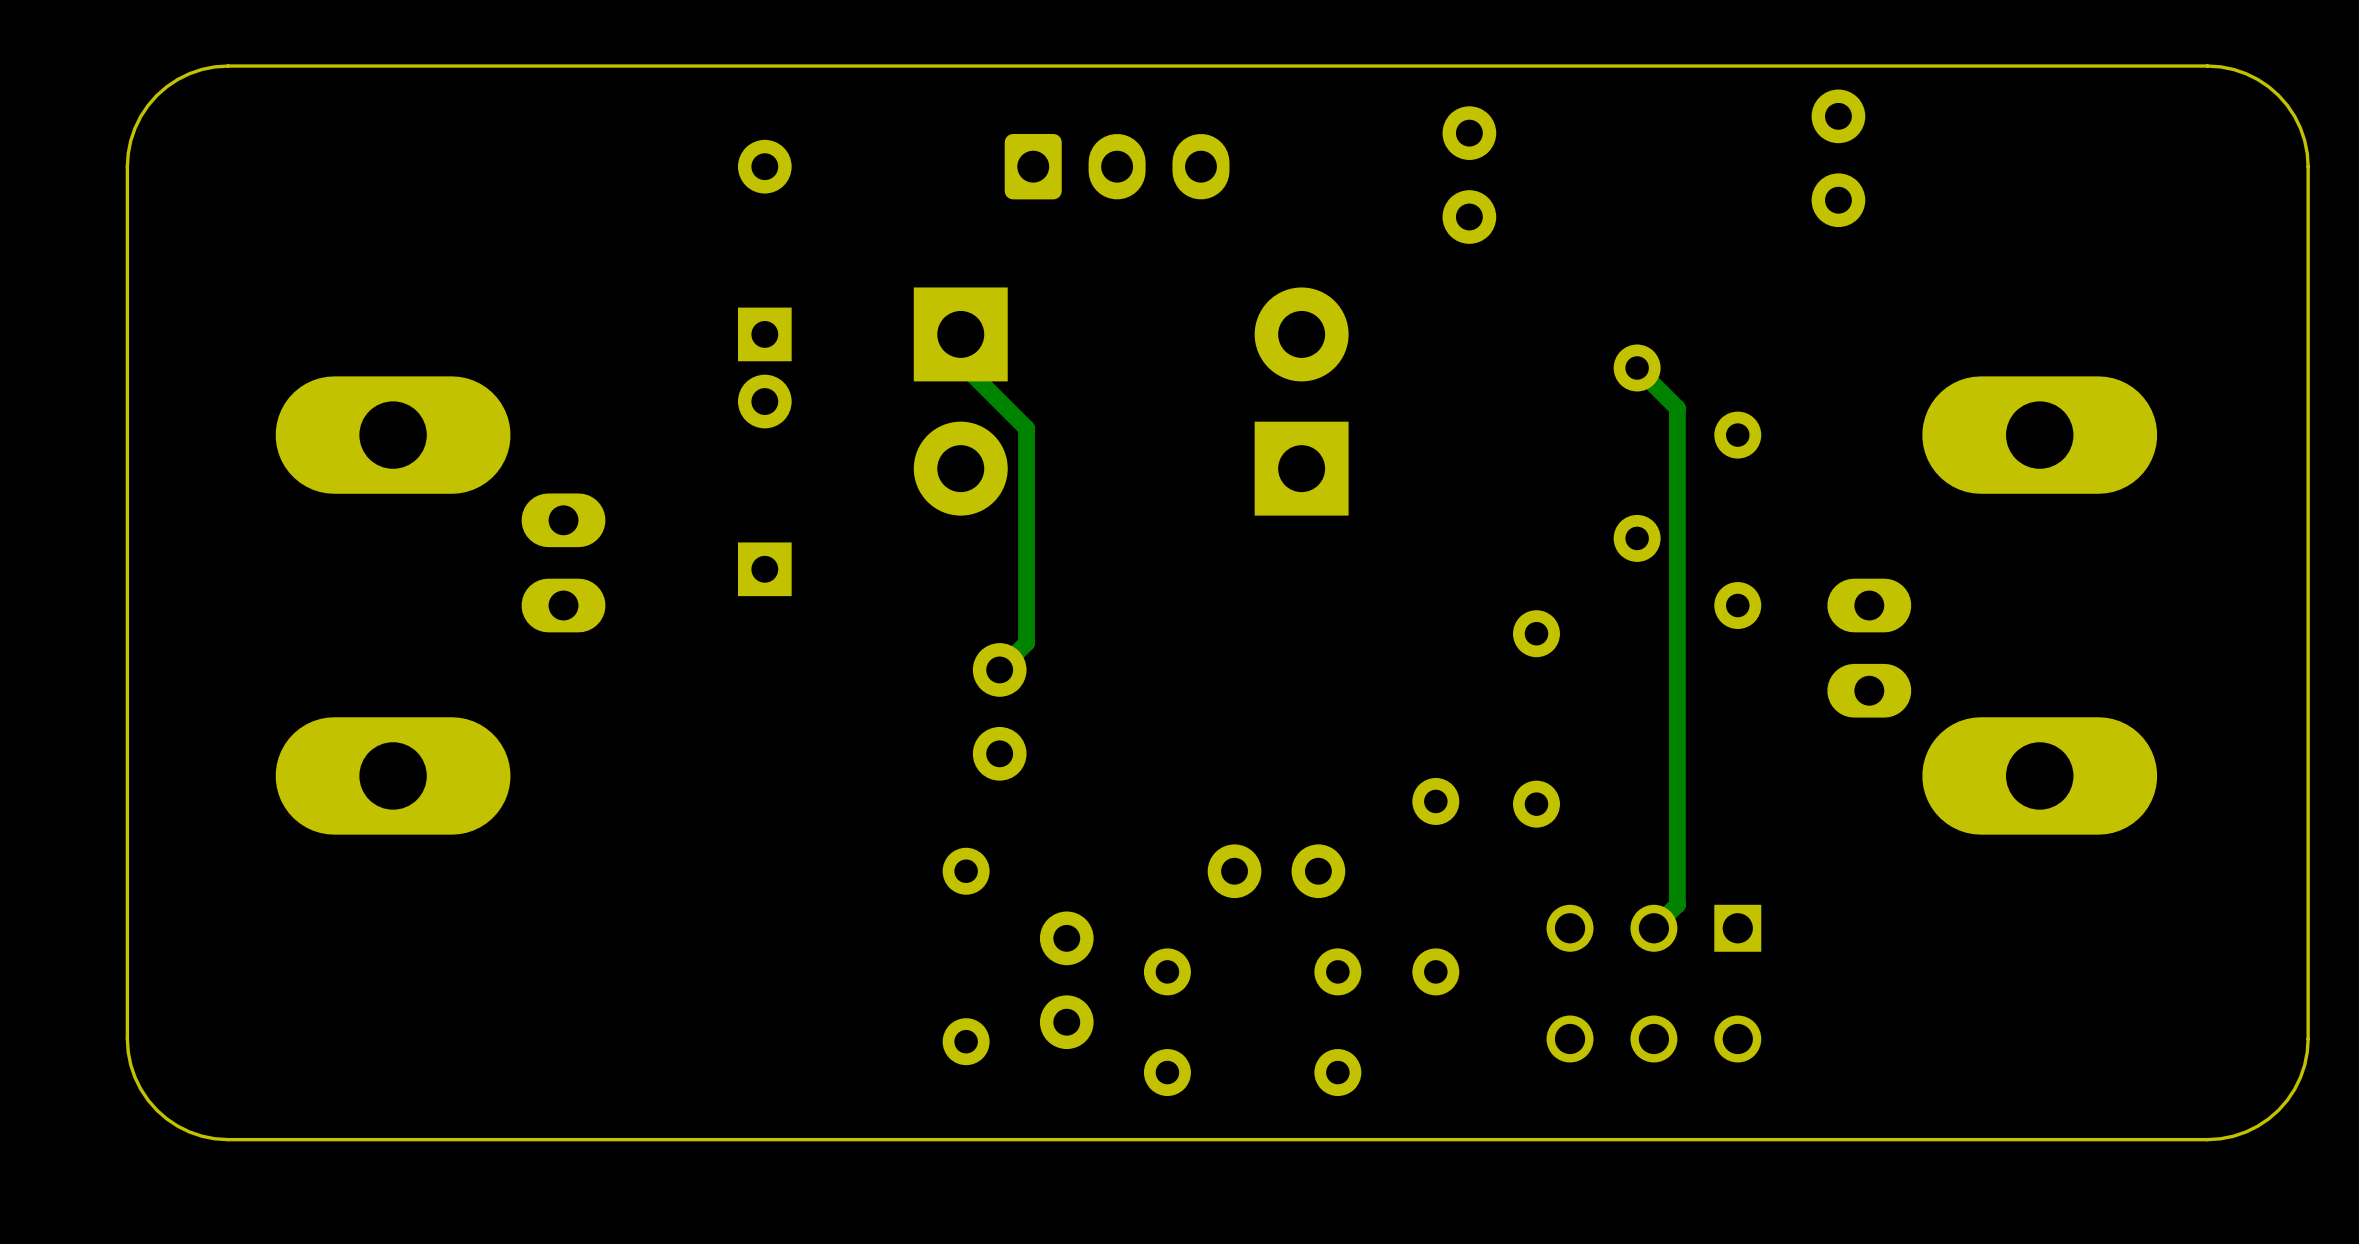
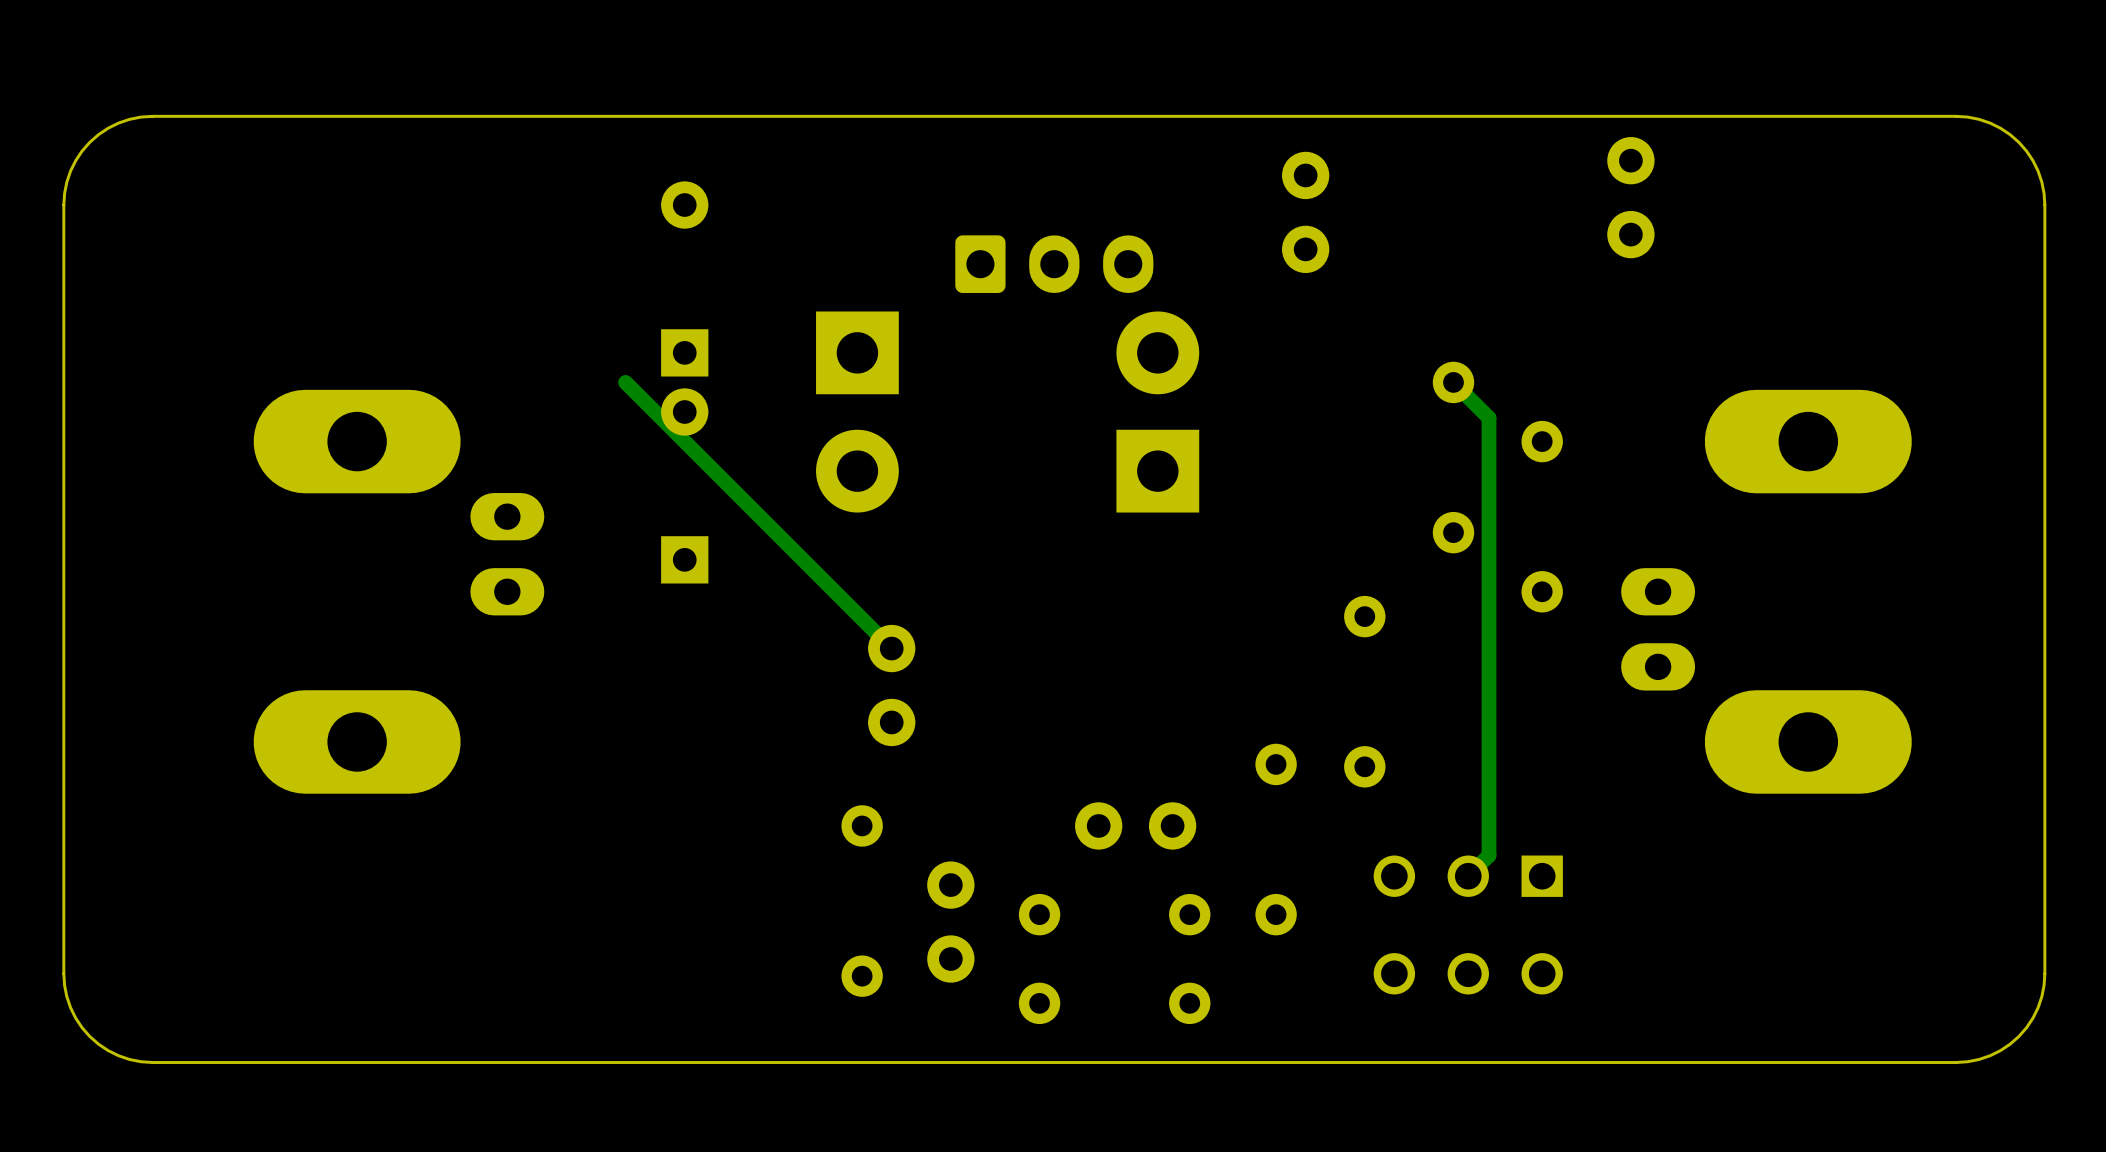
board edge: (228, 66) (201, 69) (189, 73) (177, 79) (156, 95) (140, 116) (135, 128) (128, 153) (127, 166) (128, 1052) (135, 1077) (140, 1089) (156, 1110) (177, 1126) (189, 1131) (201, 1136) (228, 1139) -> (211, 116) (140, 117) (129, 119) (108, 128) (89, 142) (75, 160) (66, 182) (63, 205) (64, 985) (70, 1007) (75, 1018) (89, 1036) (108, 1050) (129, 1059) (140, 1061) (211, 1062)
part position: (1117, 166) -> (1054, 264)
track: (960, 334) (960, 362) (1026, 428) (1026, 643) (999, 669) -> (625, 382) (891, 648)

